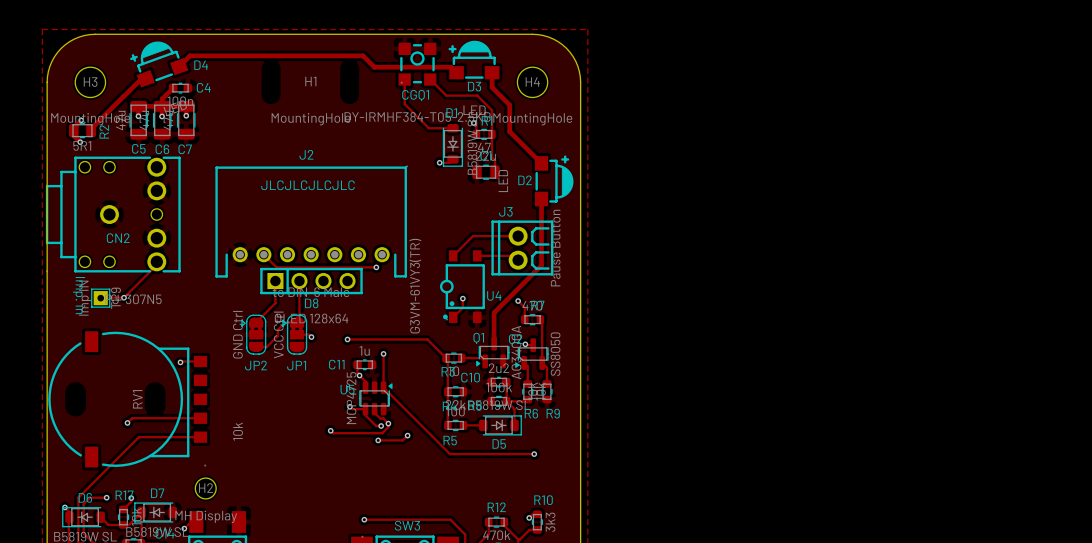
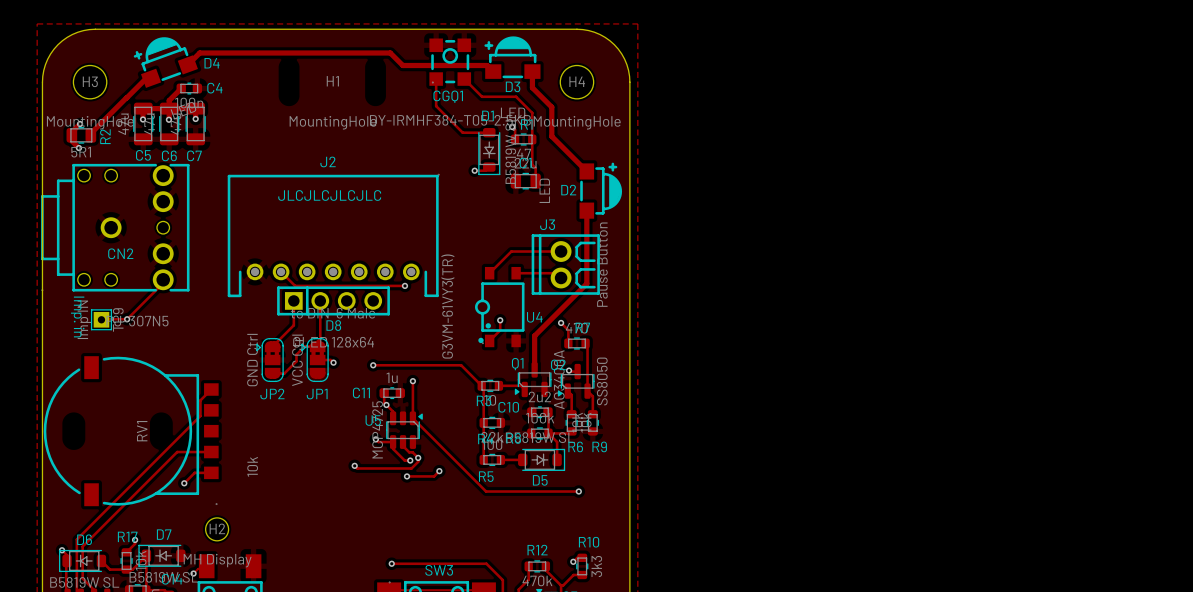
track: (200, 361) (180, 362) -> (211, 389) (200, 400) (200, 415) (143, 472)
via: (180, 362) -> none
track: (169, 418) (132, 418) (127, 422) -> (177, 452) (89, 539)
via: (127, 422) -> none
track: (138, 437) (185, 437) -> (184, 483) (194, 472)
via: none -> (184, 483)
track: (90, 497) (106, 497) -> none
via: (106, 497) -> none

